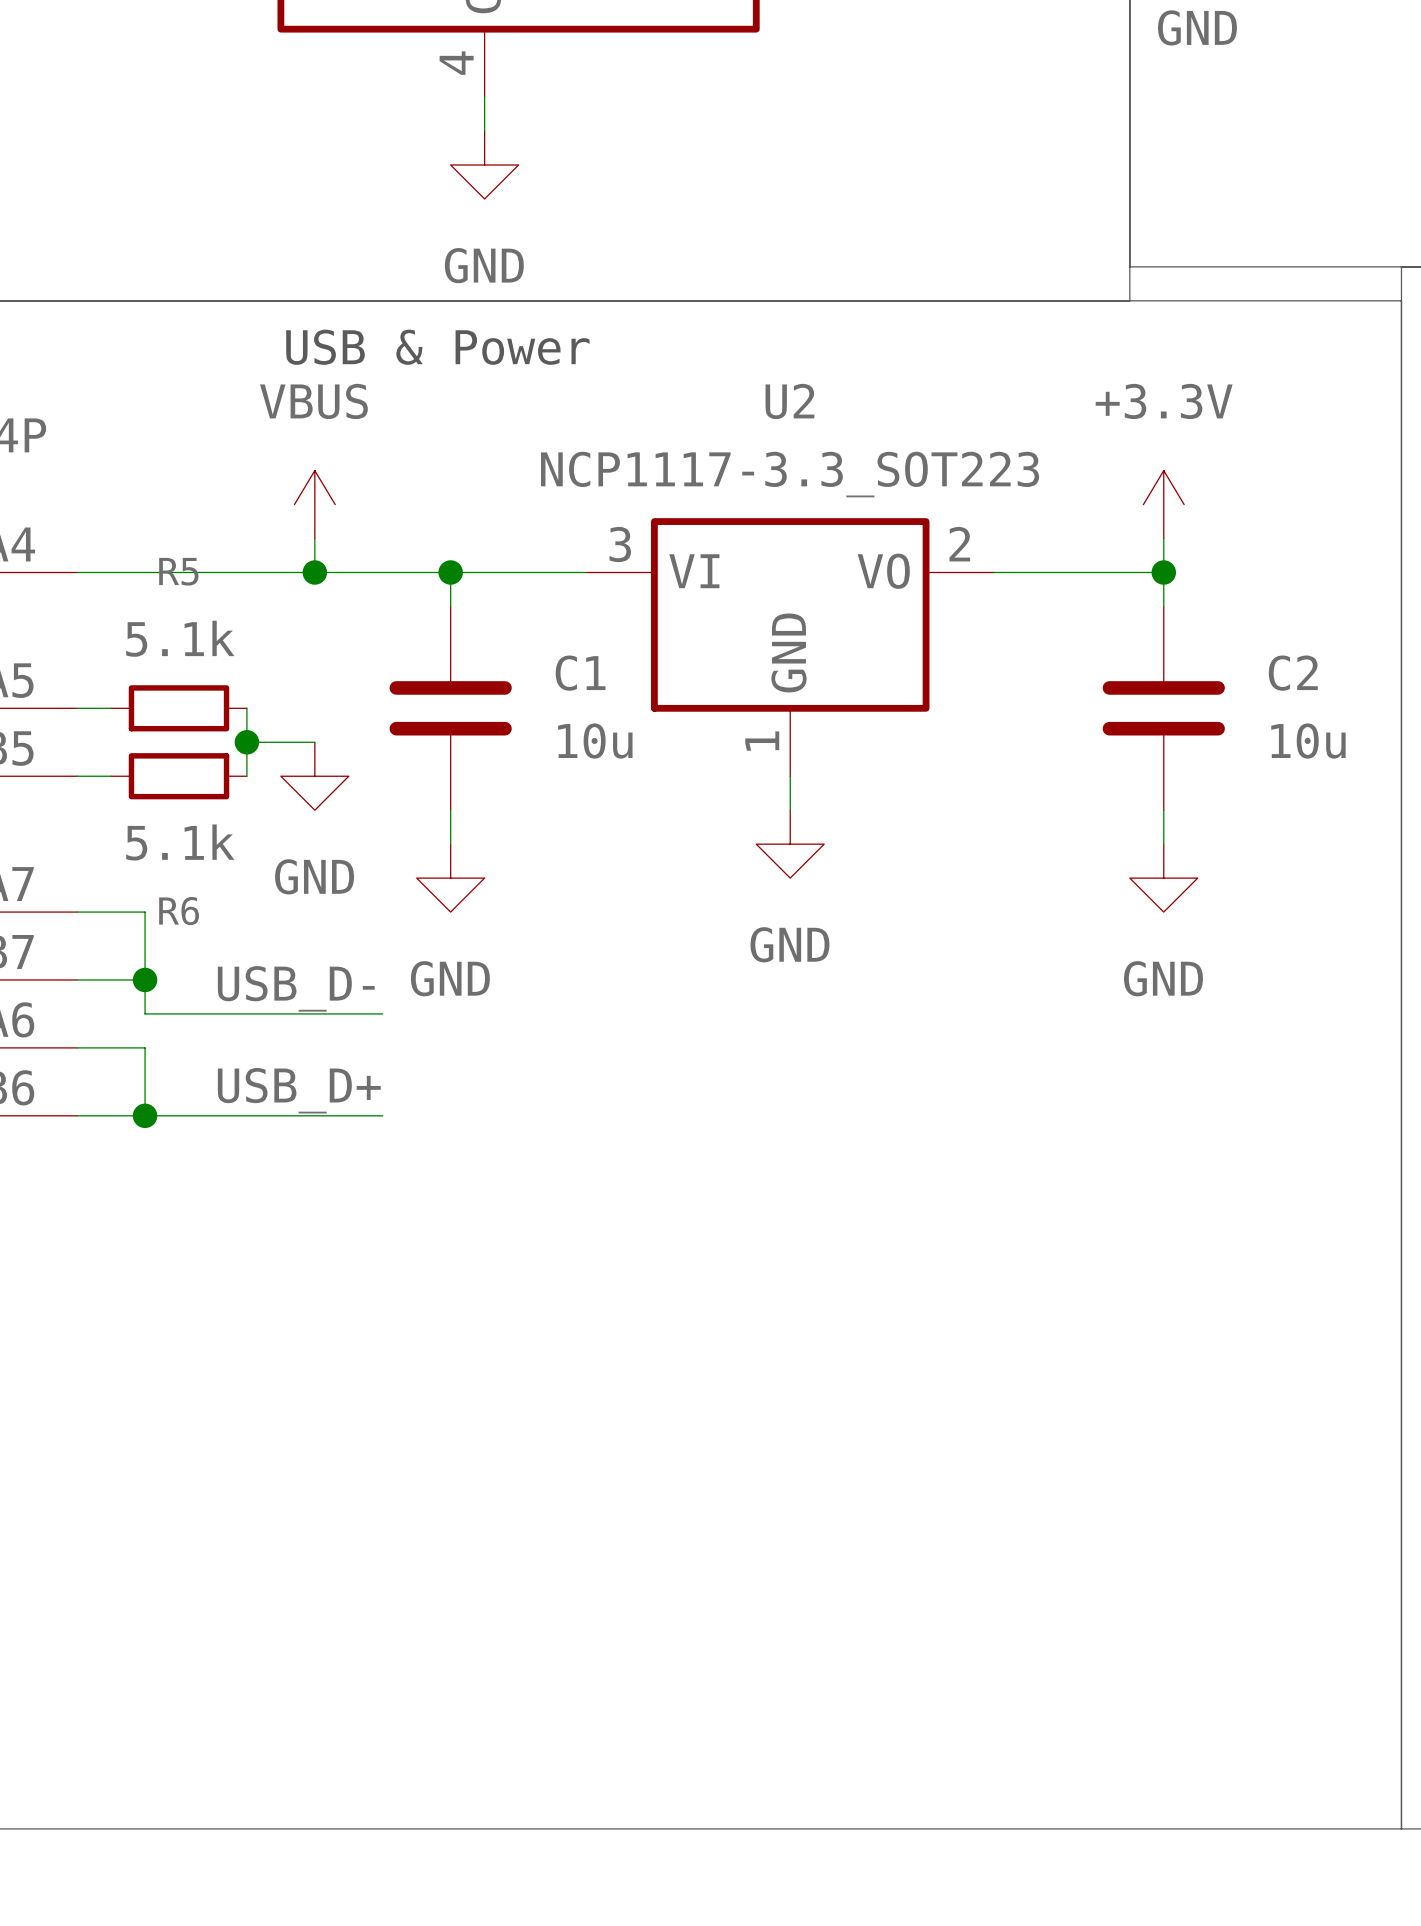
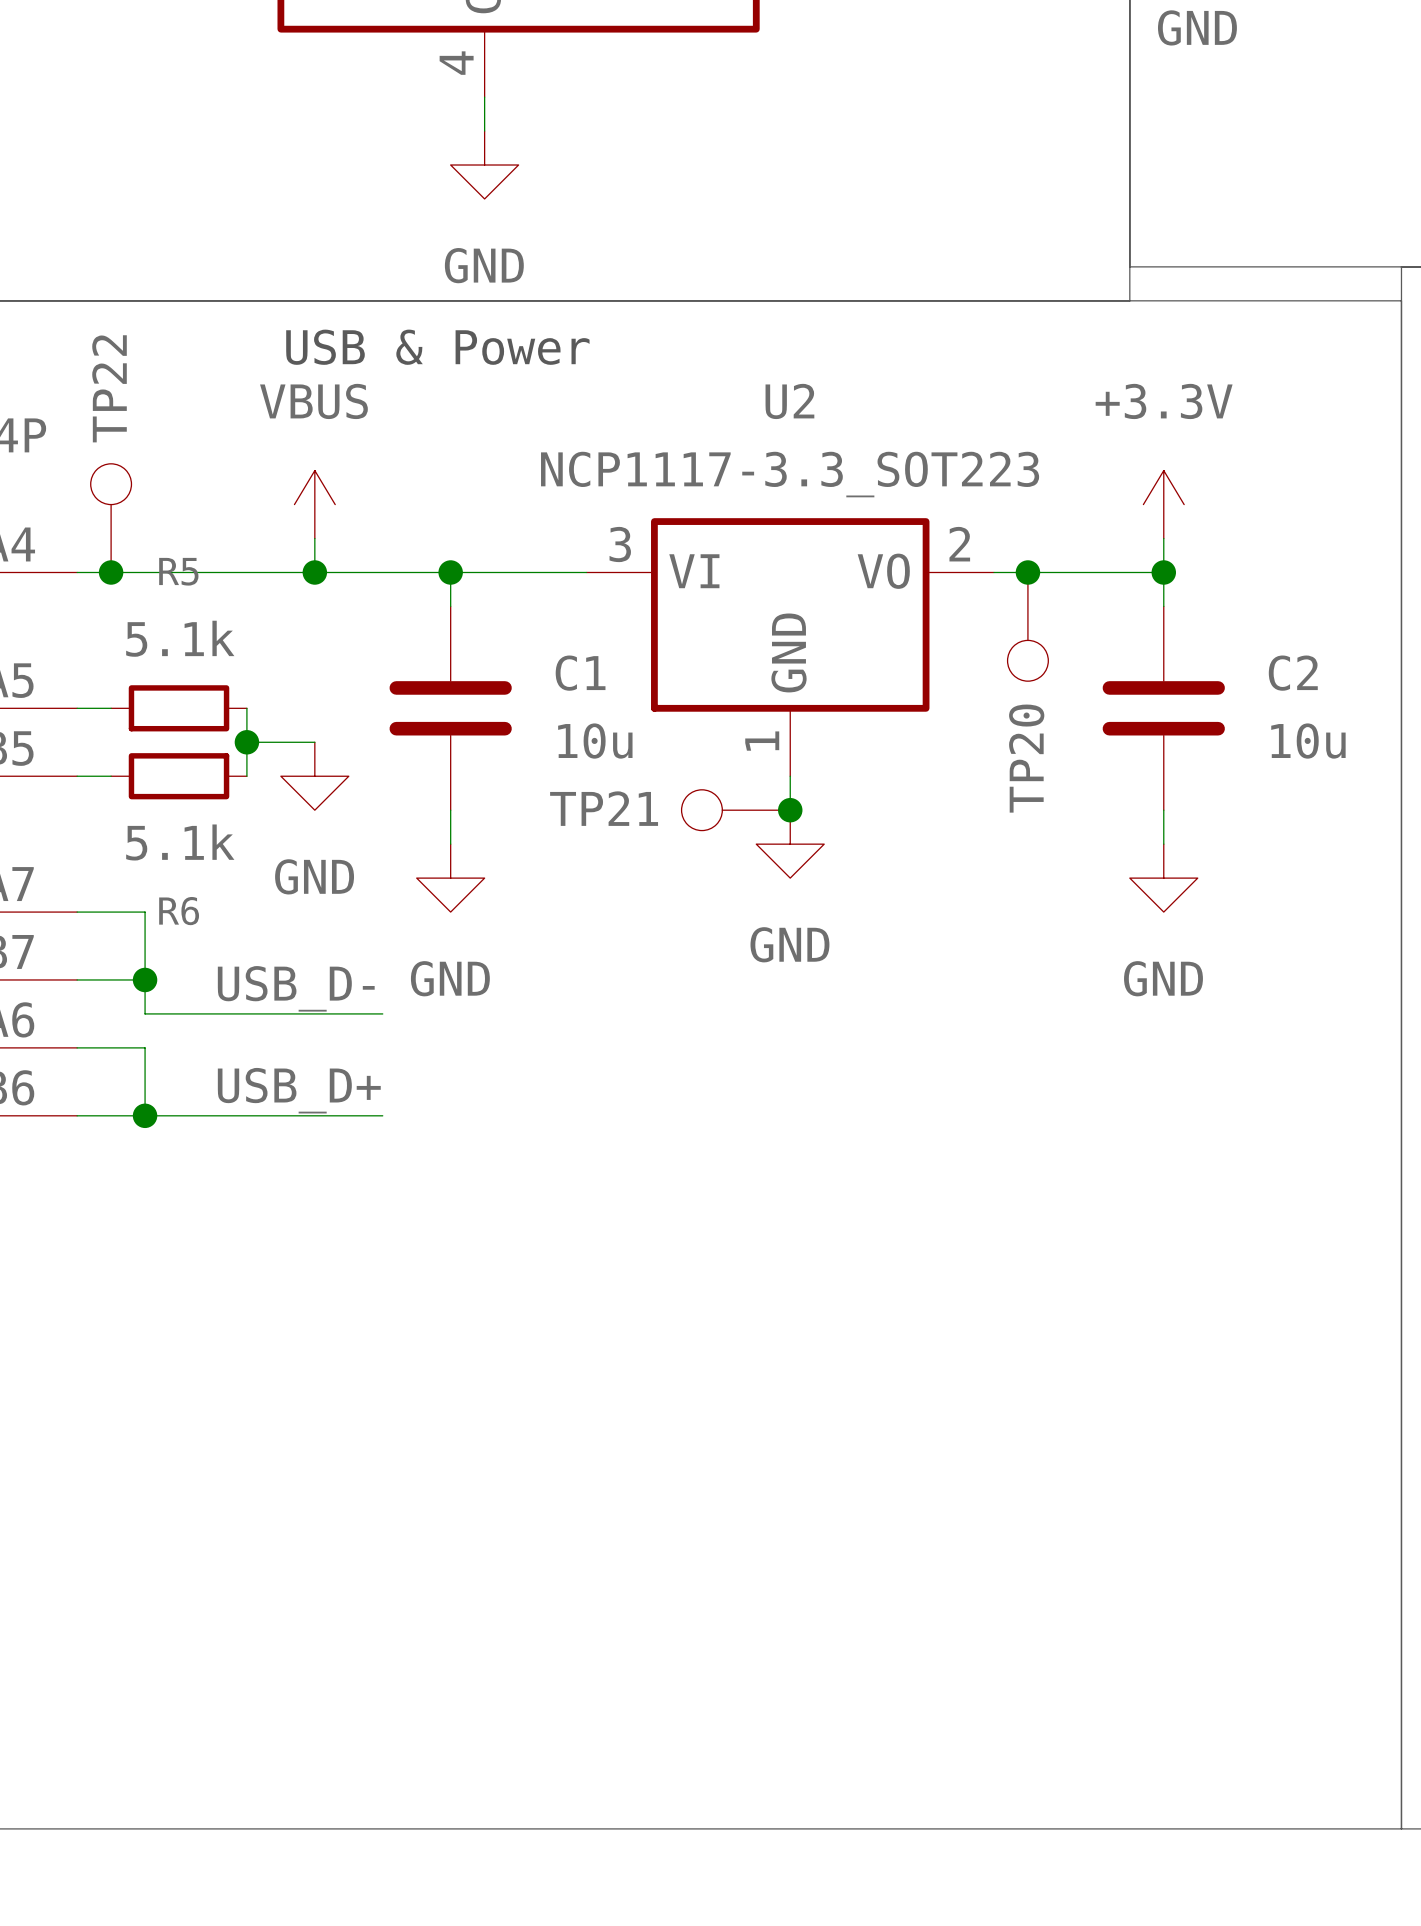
TP22: none -> (111, 518)
junction: none -> (111, 572)
junction: none -> (1027, 572)
TP20: none -> (1027, 626)
TP21: none -> (735, 810)
junction: none -> (790, 810)

